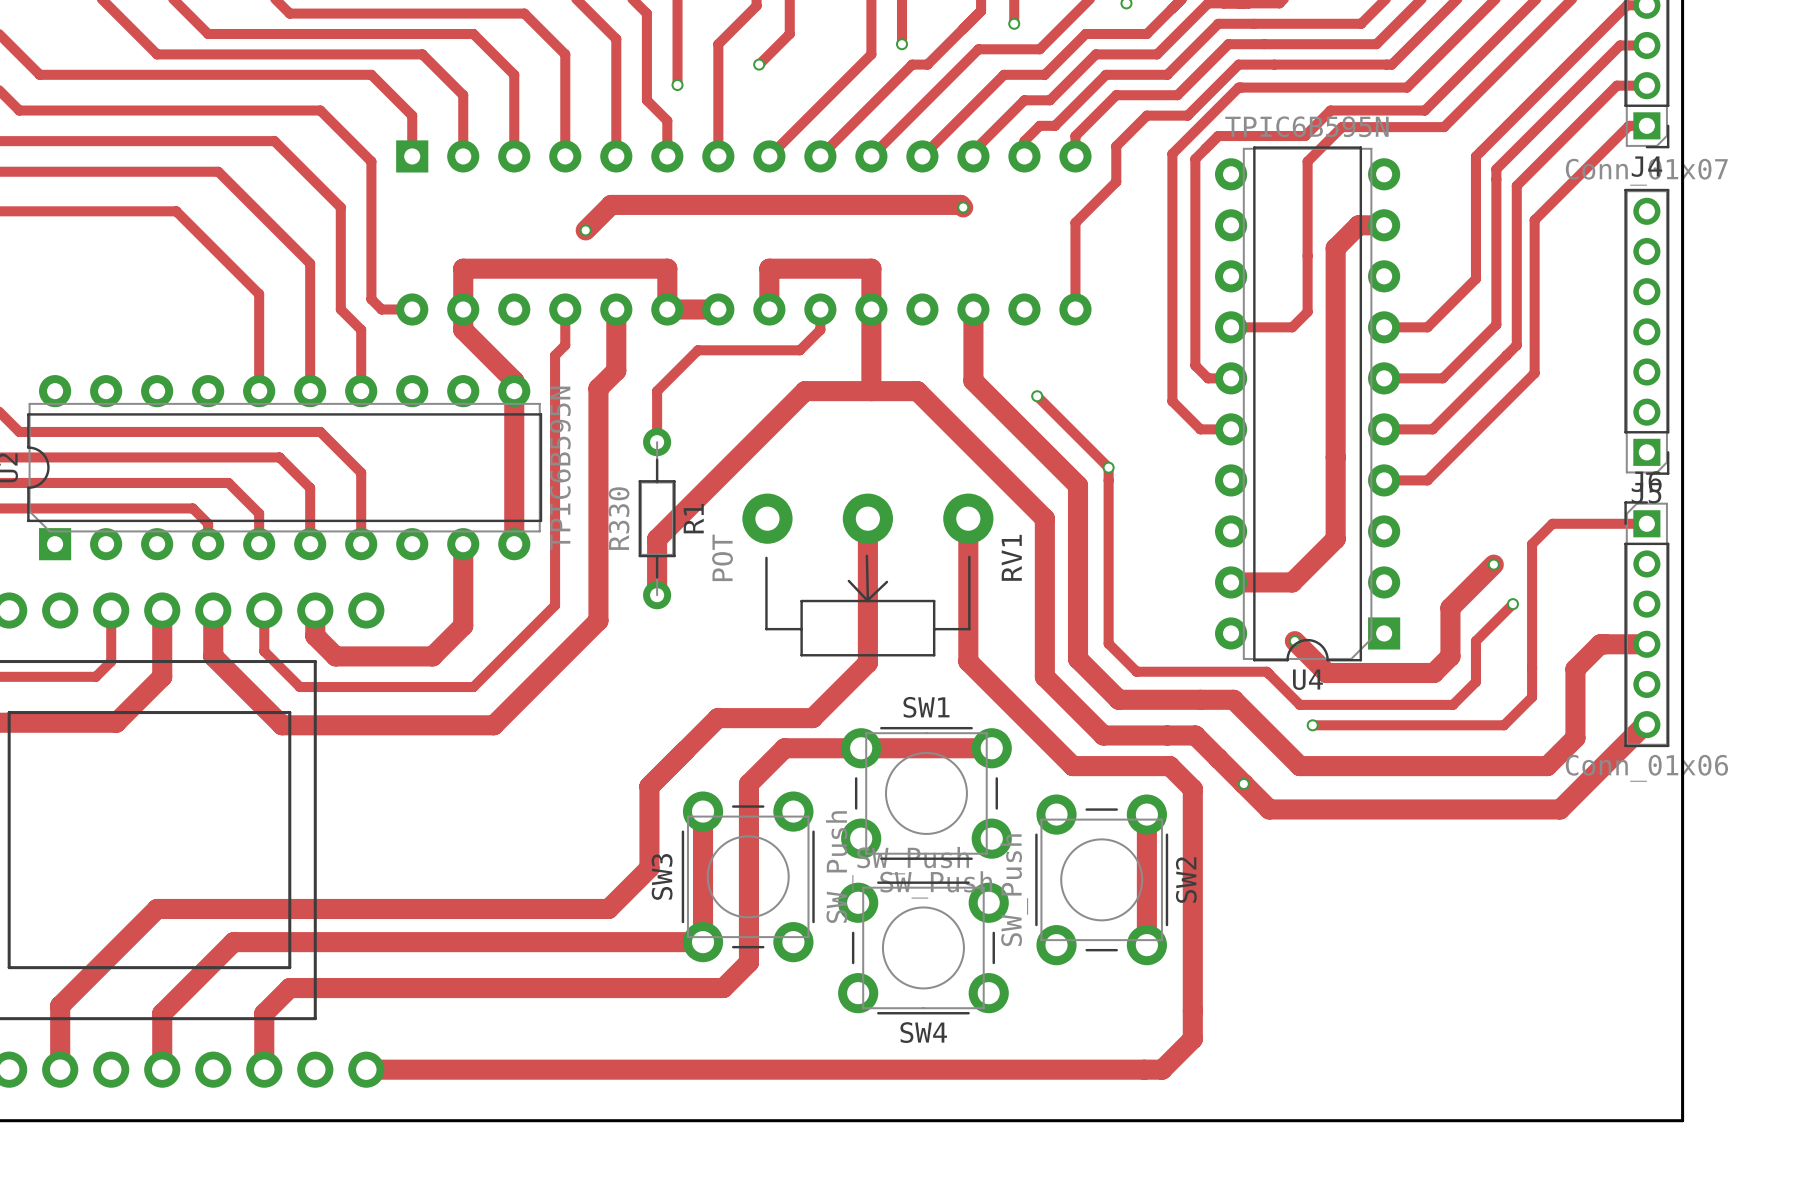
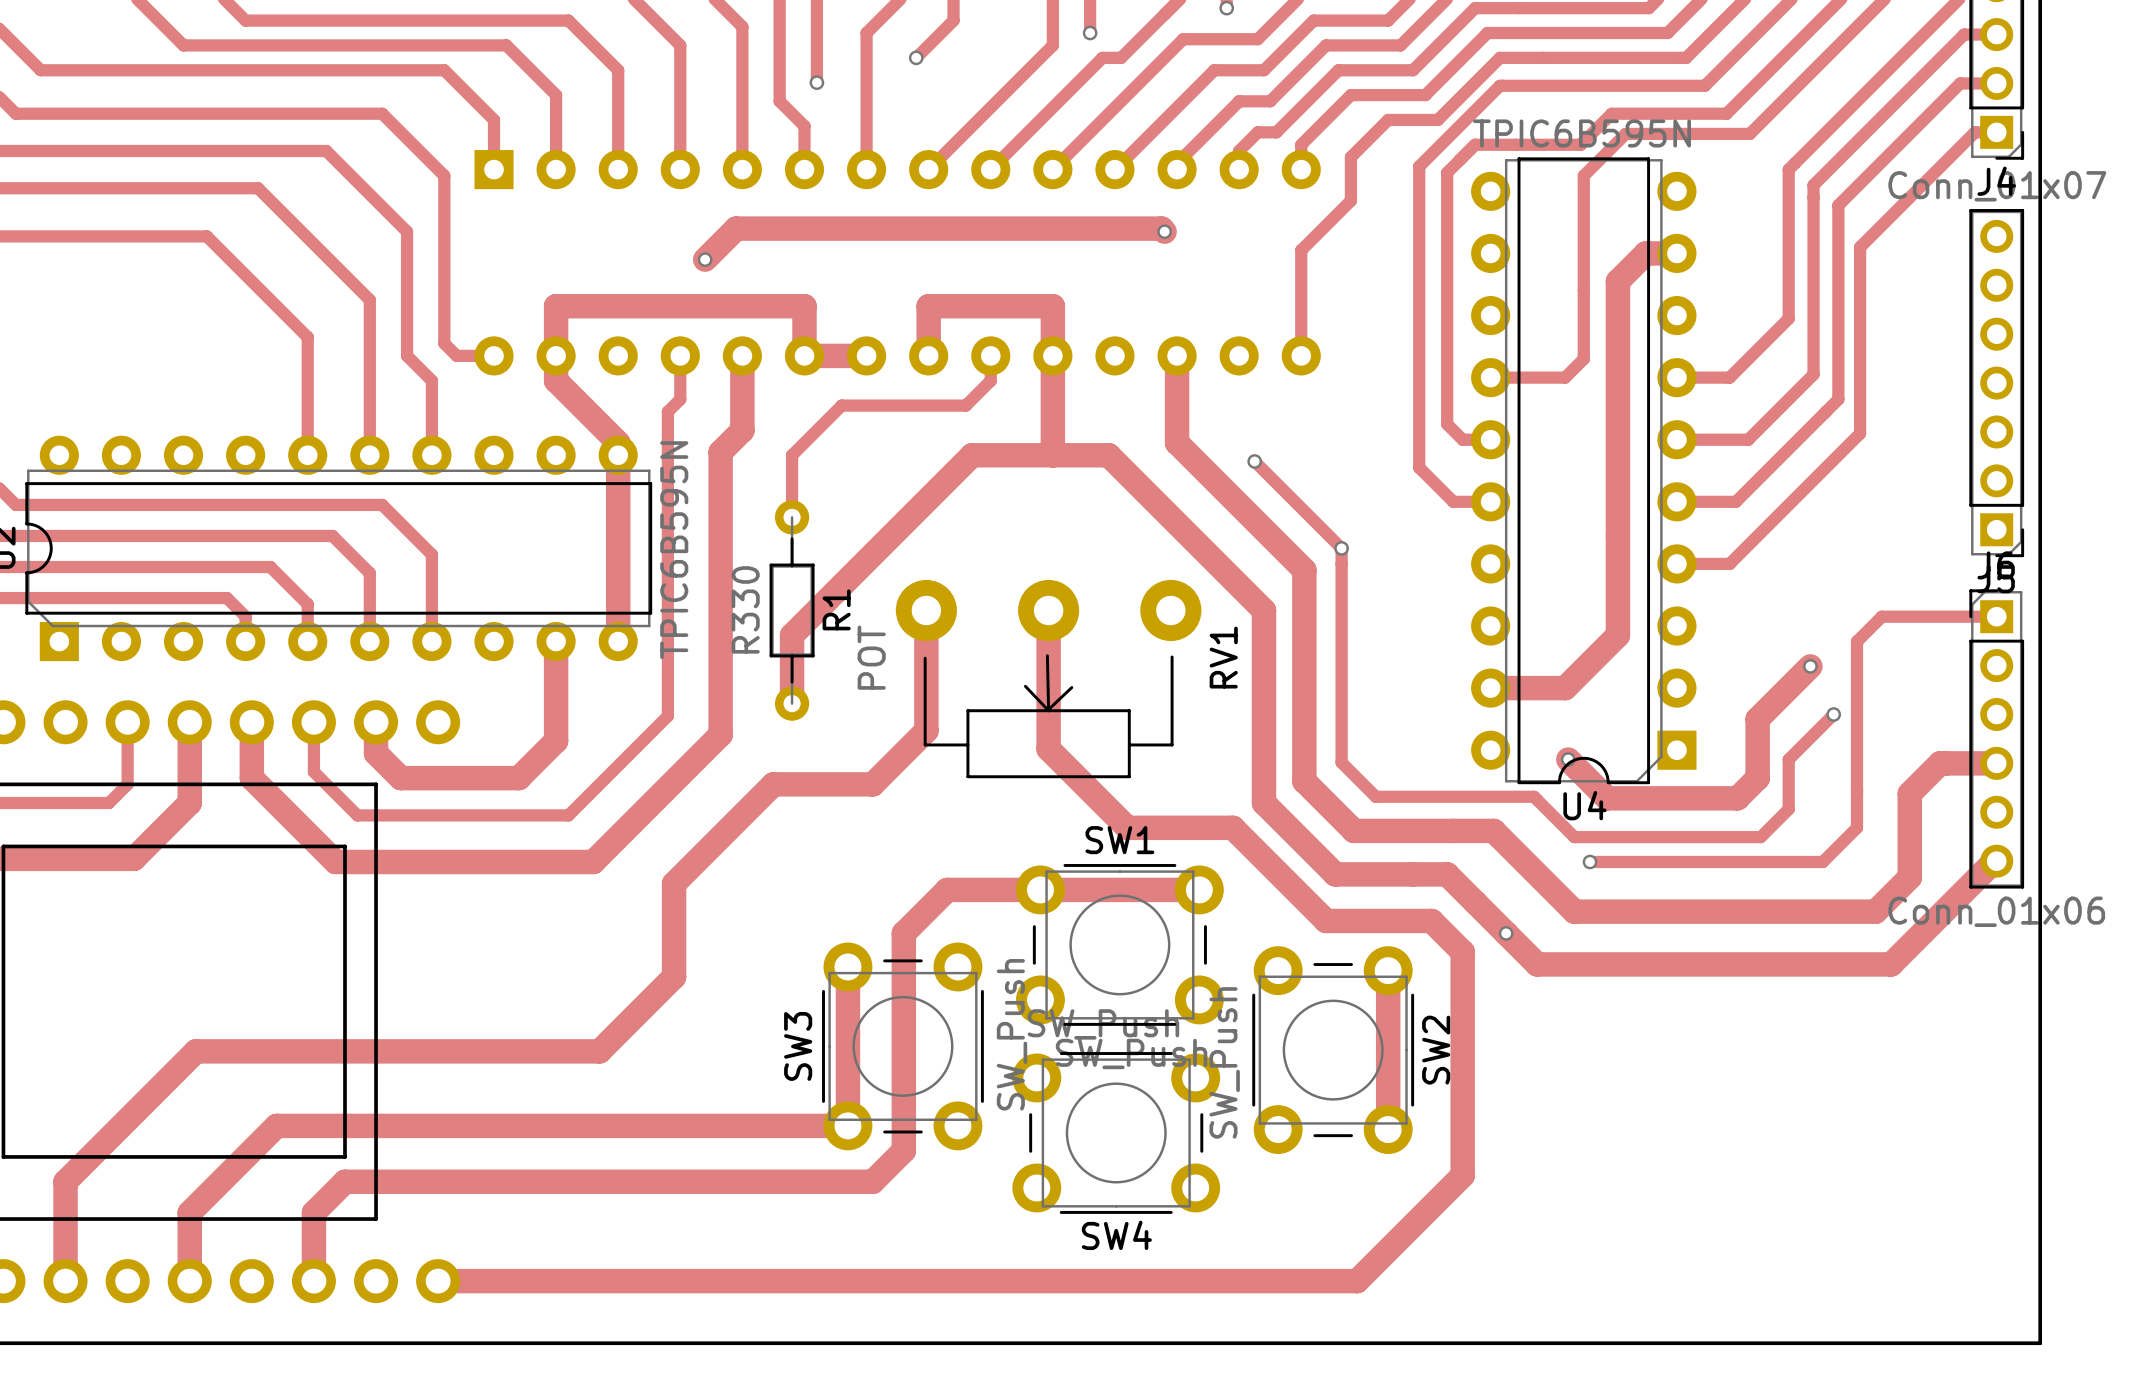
track: (968, 518) (968, 661) (1072, 766) (1169, 766) (1192, 789) (1192, 1039) (1162, 1069) (1121, 1069) -> (1048, 749) (1127, 827) (1232, 827) (1326, 920) (1431, 920) (1462, 952) (1462, 1175) (1357, 1281)
track: (867, 632) (867, 662) (812, 718) (717, 718) (649, 786) (649, 868) (608, 908) (157, 908) (60, 1005) -> (926, 610) (926, 730) (872, 784) (773, 784) (674, 883) (674, 976) (599, 1051) (195, 1051) (65, 1181) (65, 1203)

